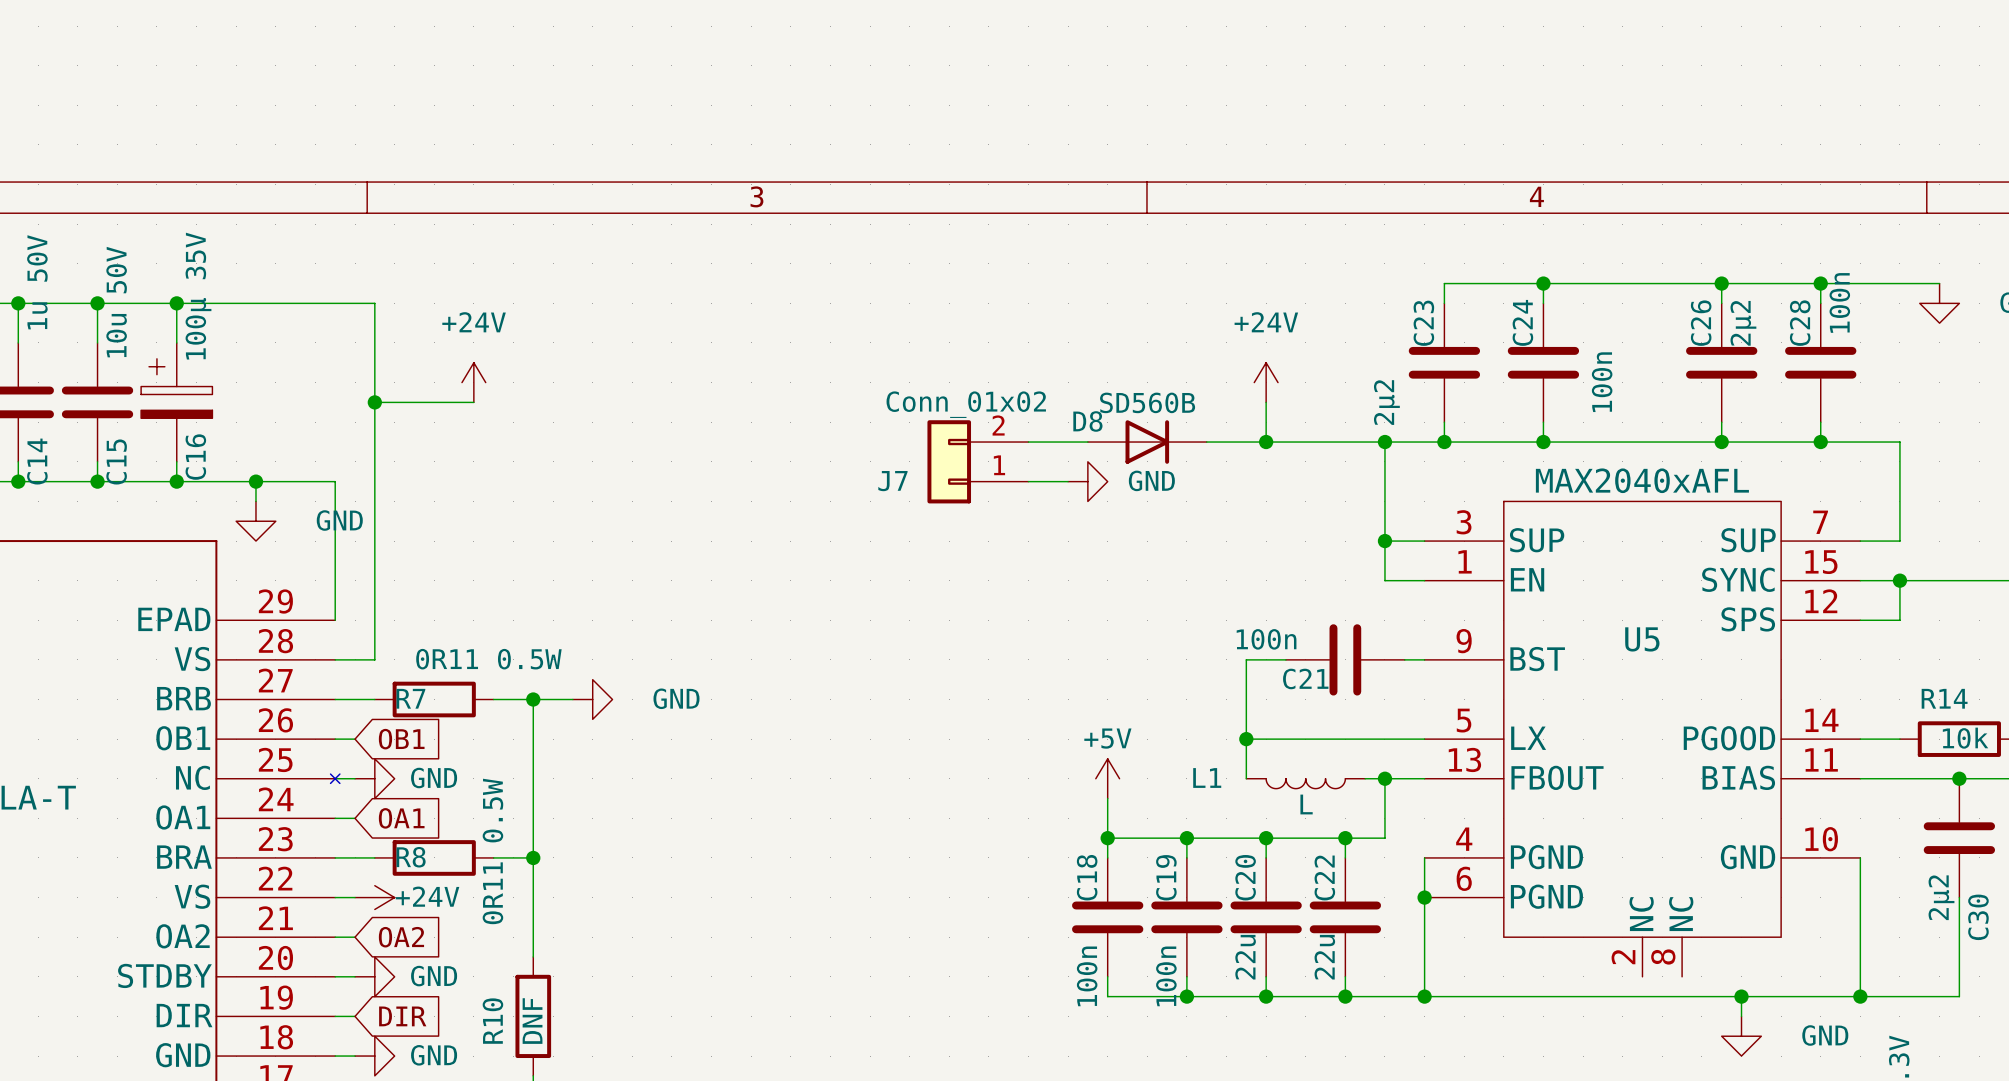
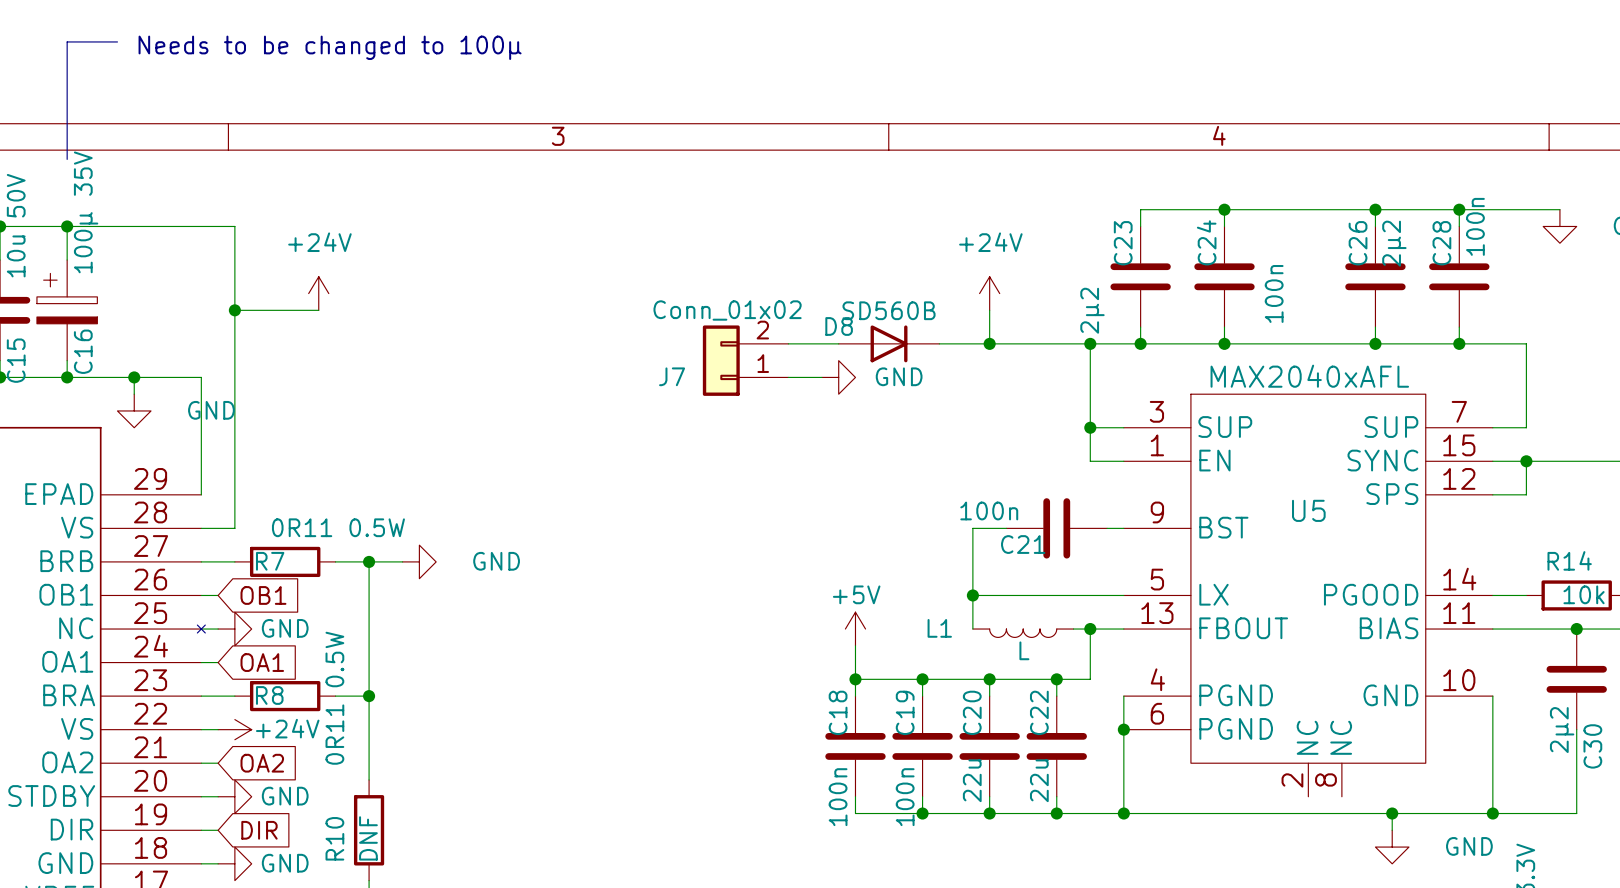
line: none -> (117, 41) (67, 41) (67, 159)
text: none -> Needs to be changed to 100µ (330, 47)

